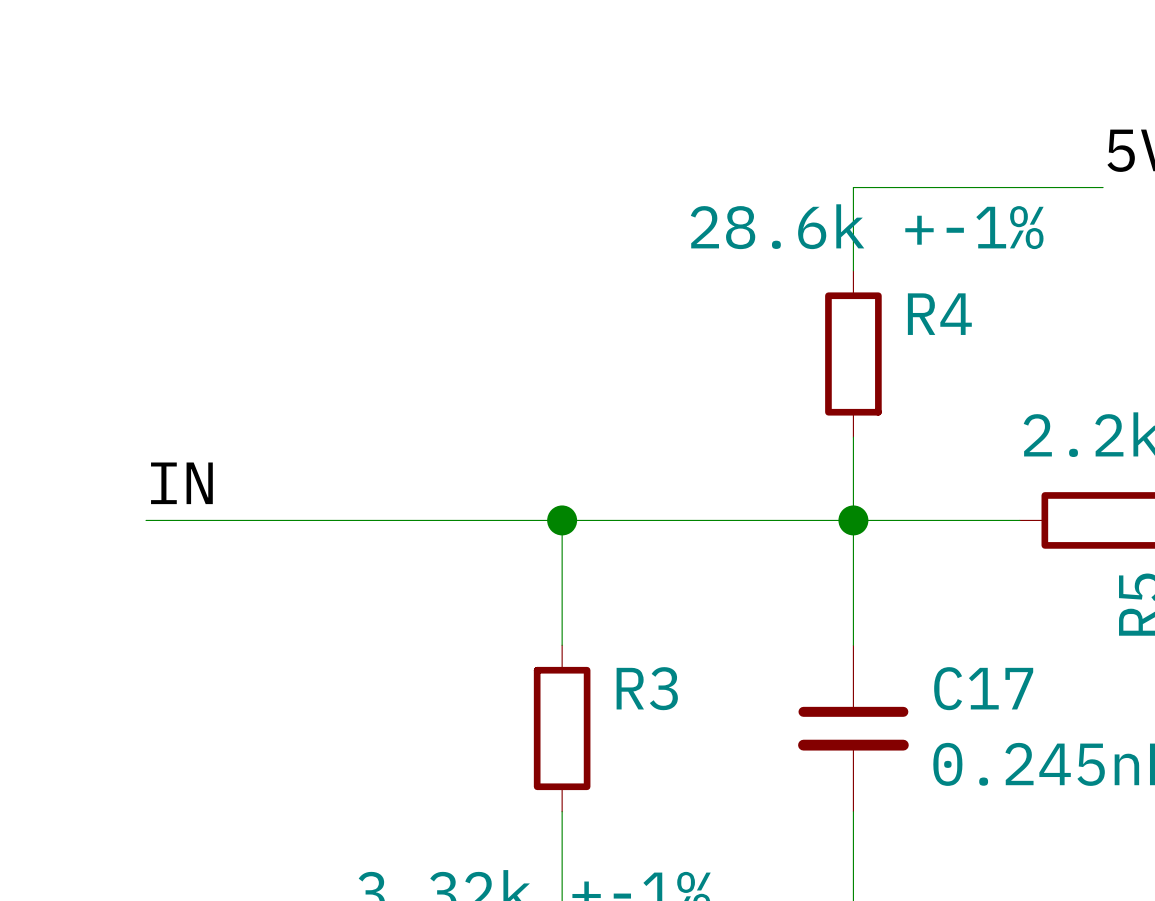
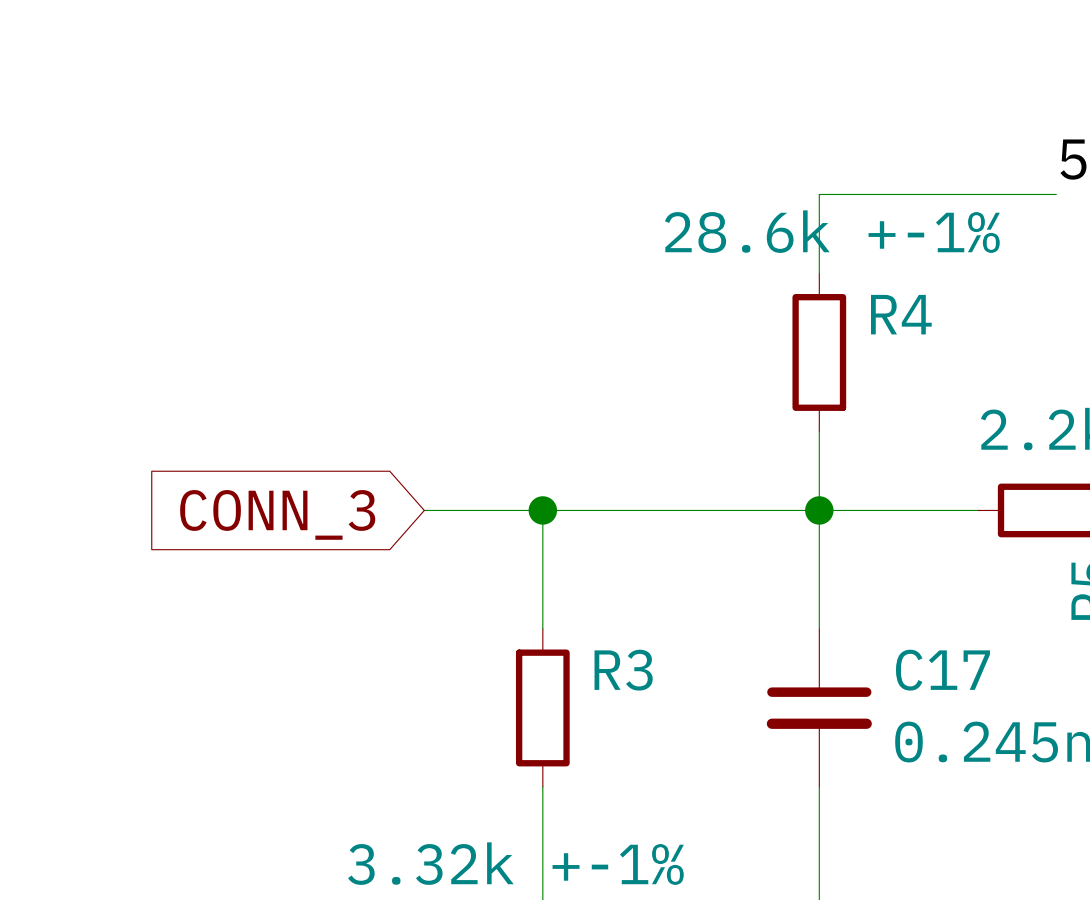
label: IN (181, 483) -> none
wire: (146, 520) (437, 520) -> none
global label: none -> CONN_3 (277, 514)

